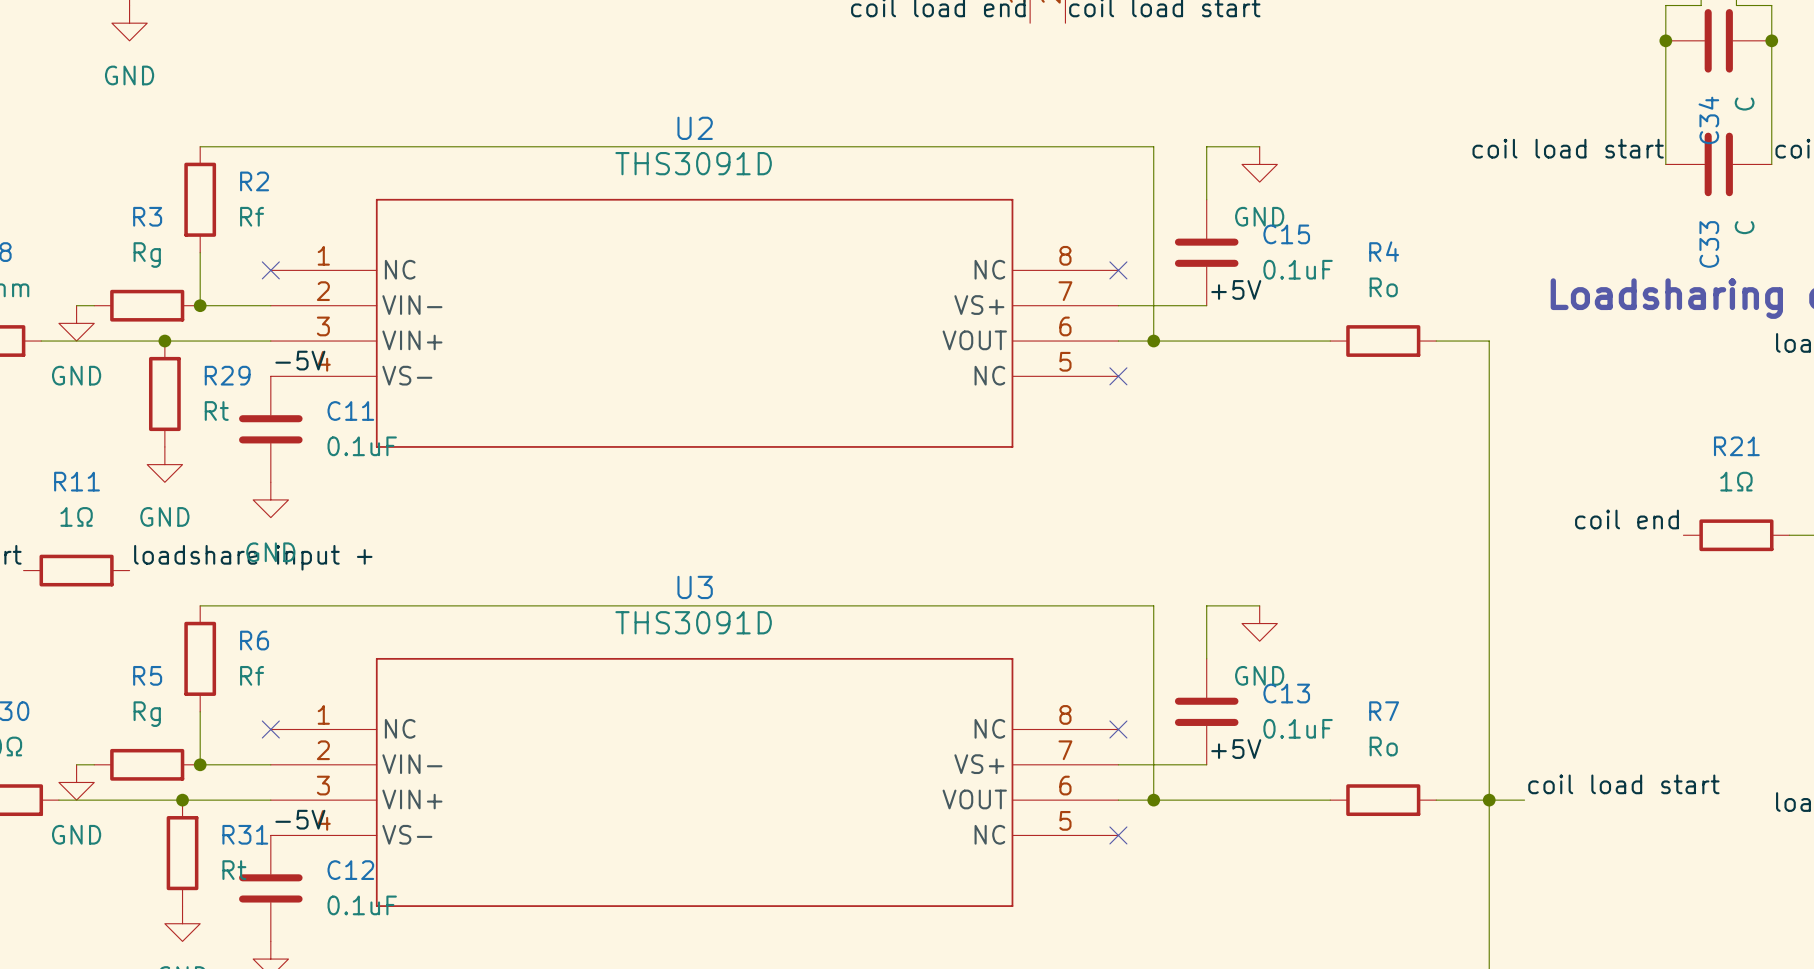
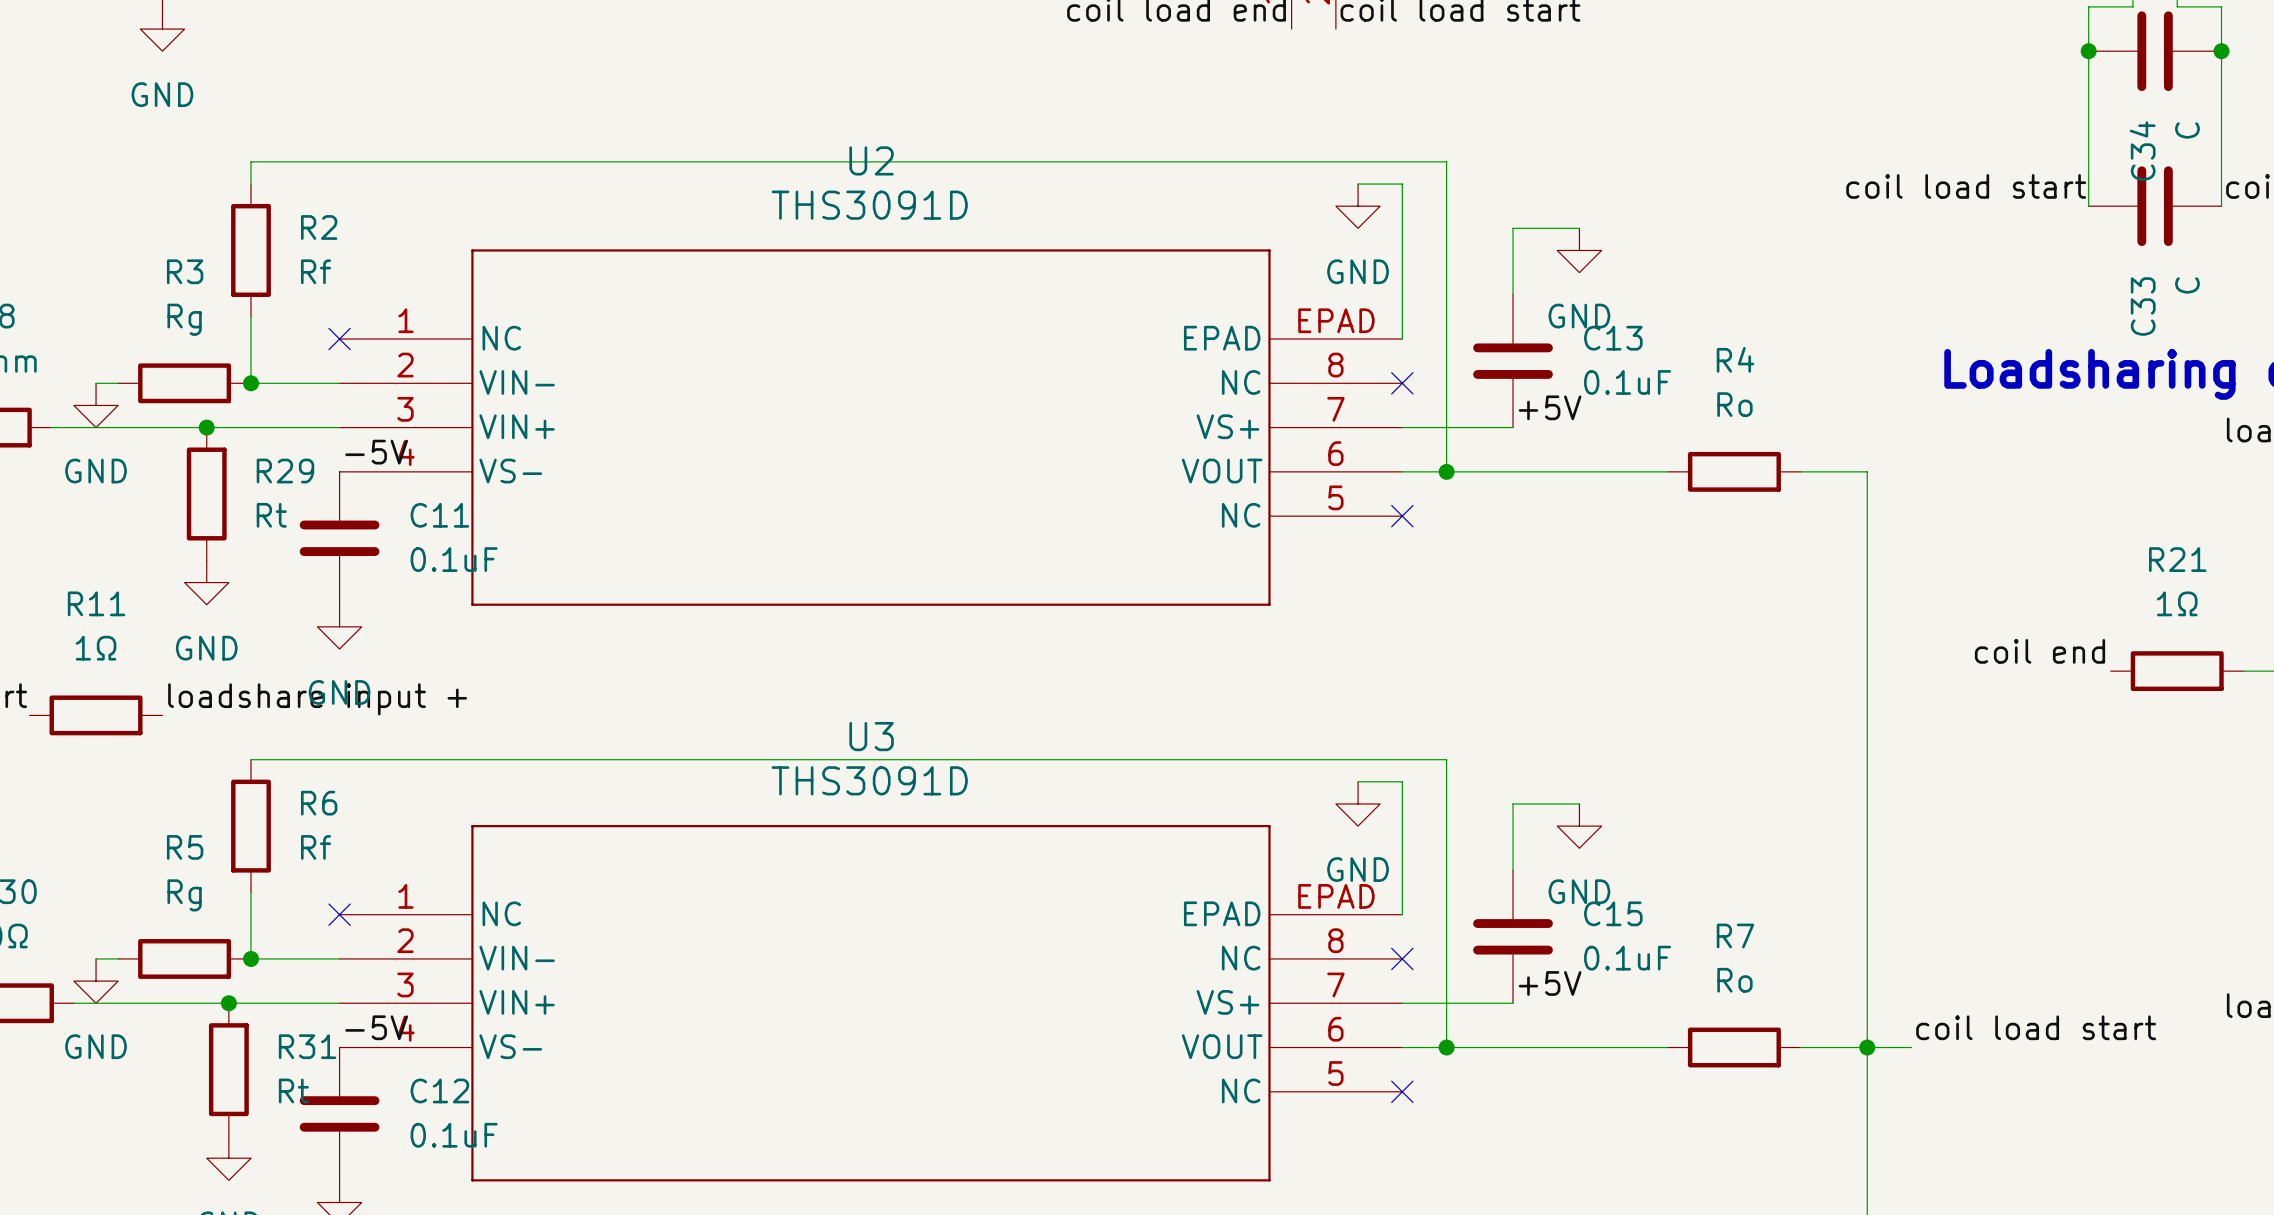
wire: (200, 146) (1083, 146) -> (251, 184) (251, 161) (1446, 161) (1446, 184)
wire: (1118, 146) (1153, 146) -> (1402, 184) (1402, 339)
wire: (1259, 146) (1206, 146) (1206, 182) -> (1579, 228) (1513, 228)
power symbol: none -> GND (1358, 206)
power symbol position: GND (1259, 164) -> GND (1579, 250)
U2 symbol: [270, 198, 1119, 448] -> [339, 249, 1403, 606]
C15 position: (1206, 252) -> (1513, 936)
no-connect mark: (1118, 270) -> none
label position: +5V (1236, 289) -> +5V (1550, 407)
wire: (1118, 305) (1206, 305) -> none
no-connect mark: none -> (1402, 383)
wire: none -> (1446, 427) (1446, 471)
junction position: (1153, 341) -> (1446, 471)
wire: (1206, 341) (1330, 341) -> none
R4 position: (1383, 341) -> (1734, 471)
wire: (1436, 341) (1489, 341) (1489, 376) -> (1800, 471) (1867, 471)
wire: none -> (1402, 471) (1668, 471)
no-connect mark: (1118, 376) -> none
no-connect mark: none -> (1402, 516)
wire: (1259, 605) (1206, 605) (1206, 641) -> (1579, 803) (1513, 803)
wire: none -> (1358, 781) (1402, 781) (1402, 914)
power symbol position: GND (1259, 623) -> GND (1579, 826)
power symbol: none -> GND (1358, 803)
U3 symbol: [270, 657, 1119, 907] -> [339, 825, 1403, 1182]
C13 position: (1206, 711) -> (1513, 361)
no-connect mark: (1118, 729) -> none
label position: +5V (1236, 749) -> +5V (1550, 983)
wire: (1118, 764) (1206, 764) -> none
no-connect mark: none -> (1402, 958)
label position: coil load start (1623, 784) -> coil load start (2036, 1027)
wire: none -> (1446, 1003) (1446, 1047)
junction position: (1153, 800) -> (1446, 1047)
wire: (1206, 800) (1330, 800) -> none
R7 position: (1383, 800) -> (1734, 1047)
wire: (1436, 800) (1524, 800) -> (1800, 1047) (1911, 1047)
junction position: (1489, 800) -> (1867, 1047)
wire: none -> (1402, 1047) (1668, 1047)
no-connect mark: (1118, 835) -> none
no-connect mark: none -> (1402, 1091)

